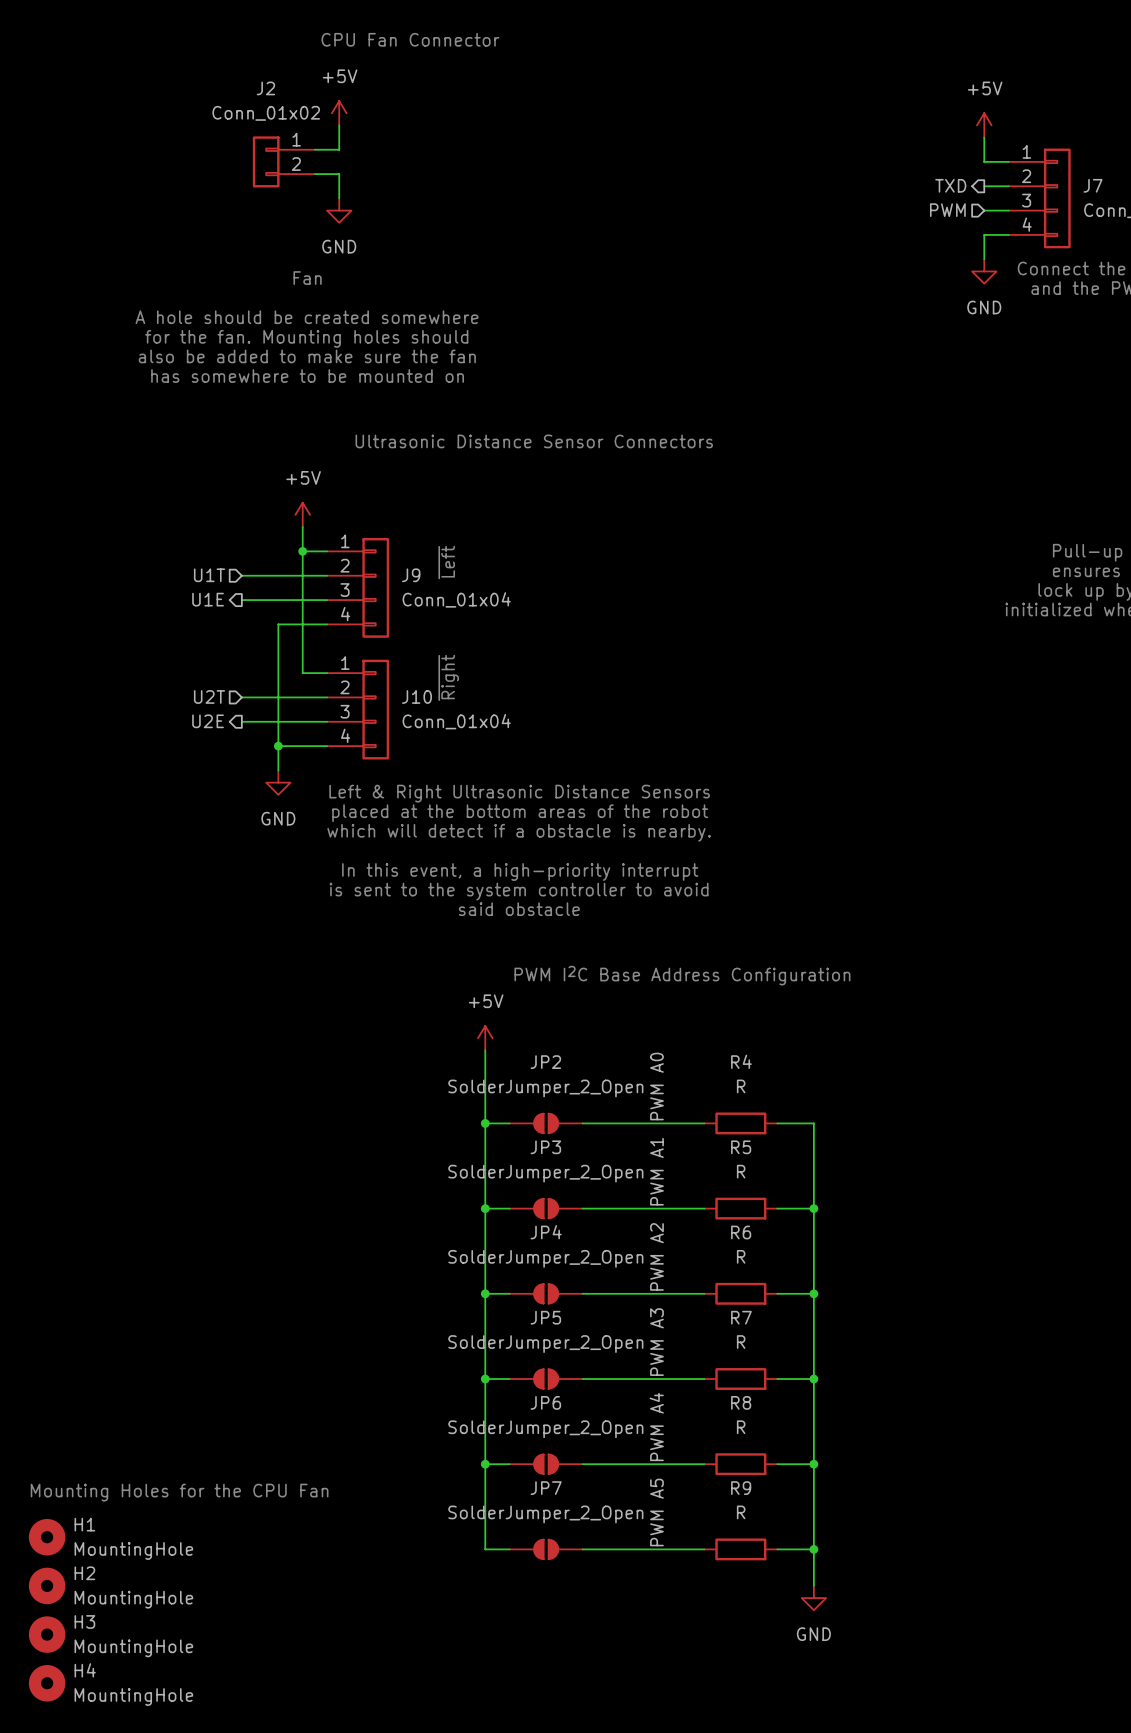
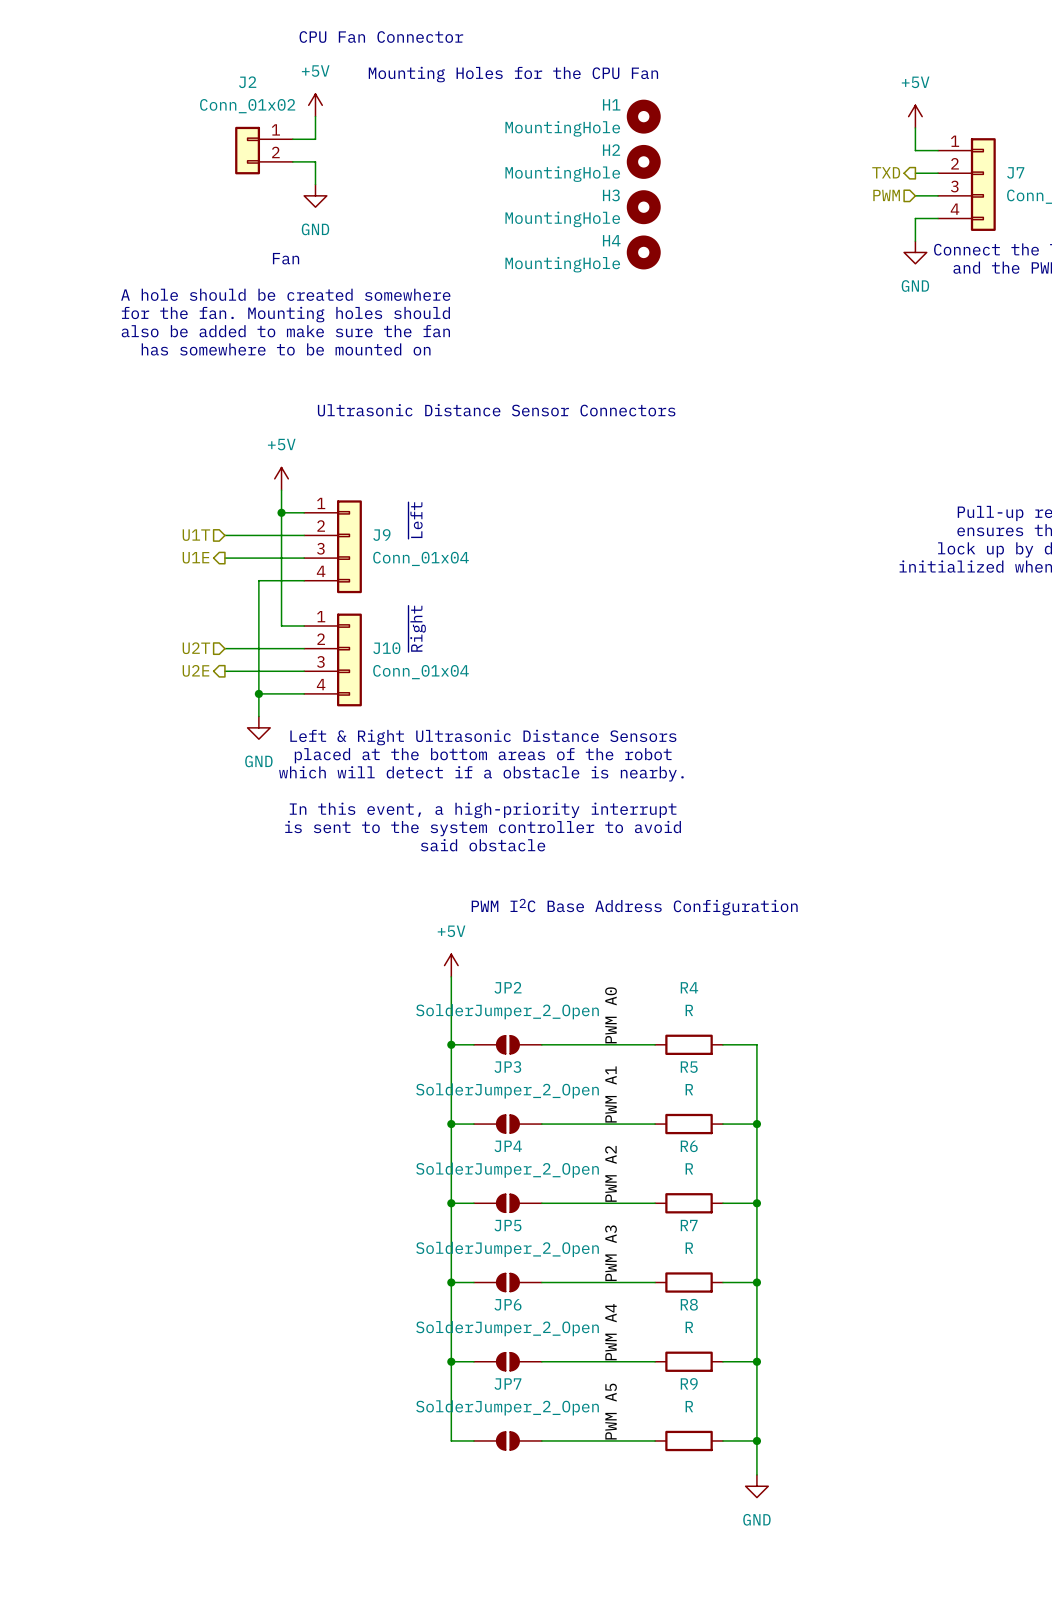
text: none -> Mounting Holes for the CPU Fan (513, 74)
text: Mounting Holes for the CPU Fan (179, 1492) -> none
H1 name position: H1 (84, 1524) -> H1 (611, 104)
H1 position: (47, 1537) -> (643, 116)
H1 value position: MountingHole (133, 1550) -> MountingHole (562, 128)
H2 name position: H2 (84, 1573) -> H2 (611, 150)
H2 position: (47, 1585) -> (643, 161)
H2 value position: MountingHole (133, 1599) -> MountingHole (562, 174)
H3 name position: H3 (84, 1621) -> H3 (611, 195)
H3 position: (47, 1634) -> (643, 207)
H3 value position: MountingHole (133, 1648) -> MountingHole (562, 219)
H4 name position: H4 (85, 1670) -> H4 (611, 240)
H4 position: (47, 1683) -> (643, 252)
H4 value position: MountingHole (133, 1697) -> MountingHole (562, 264)

